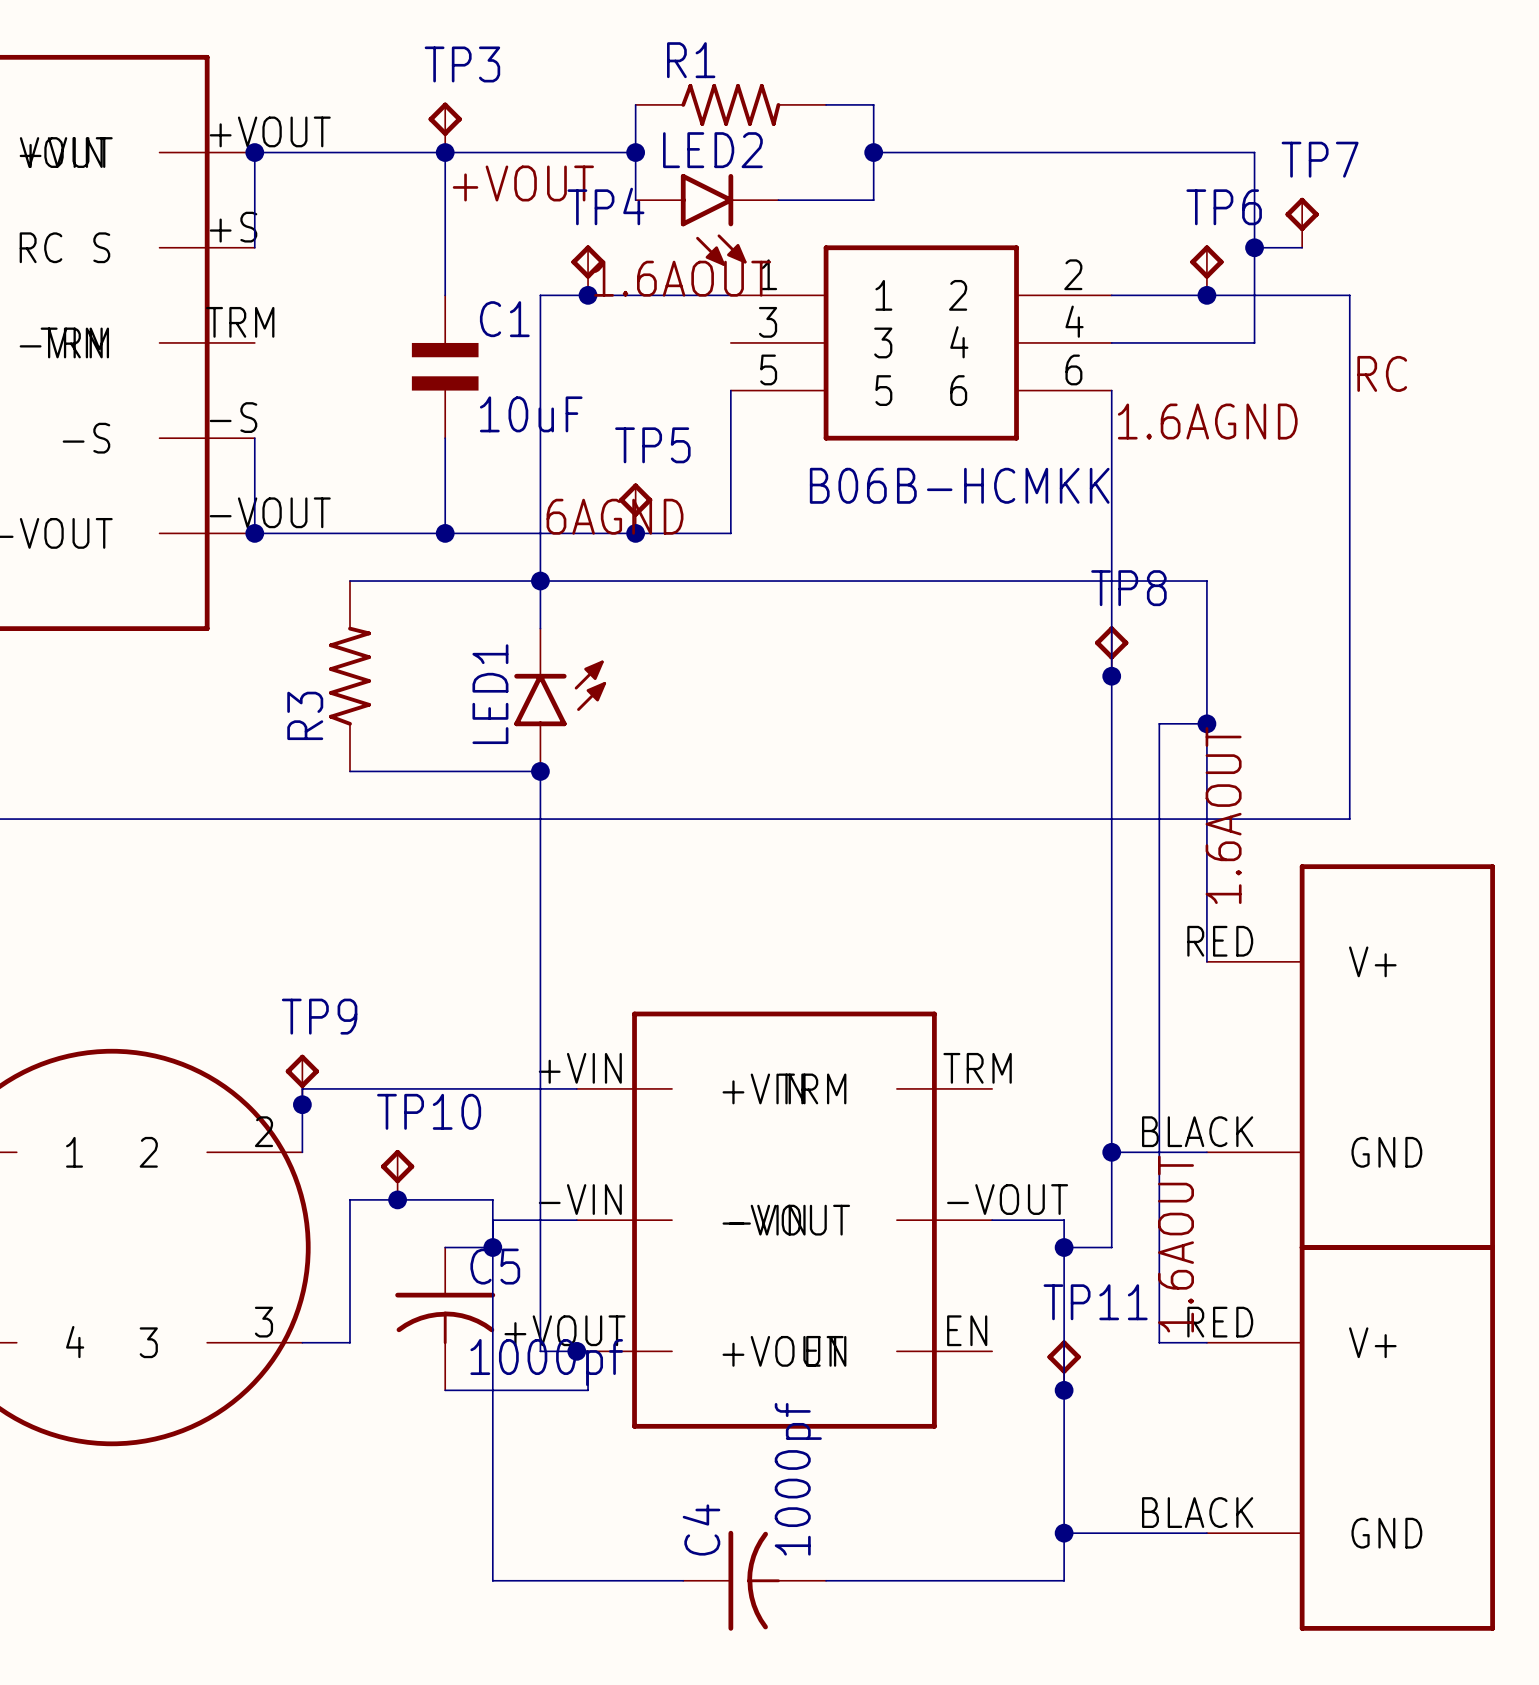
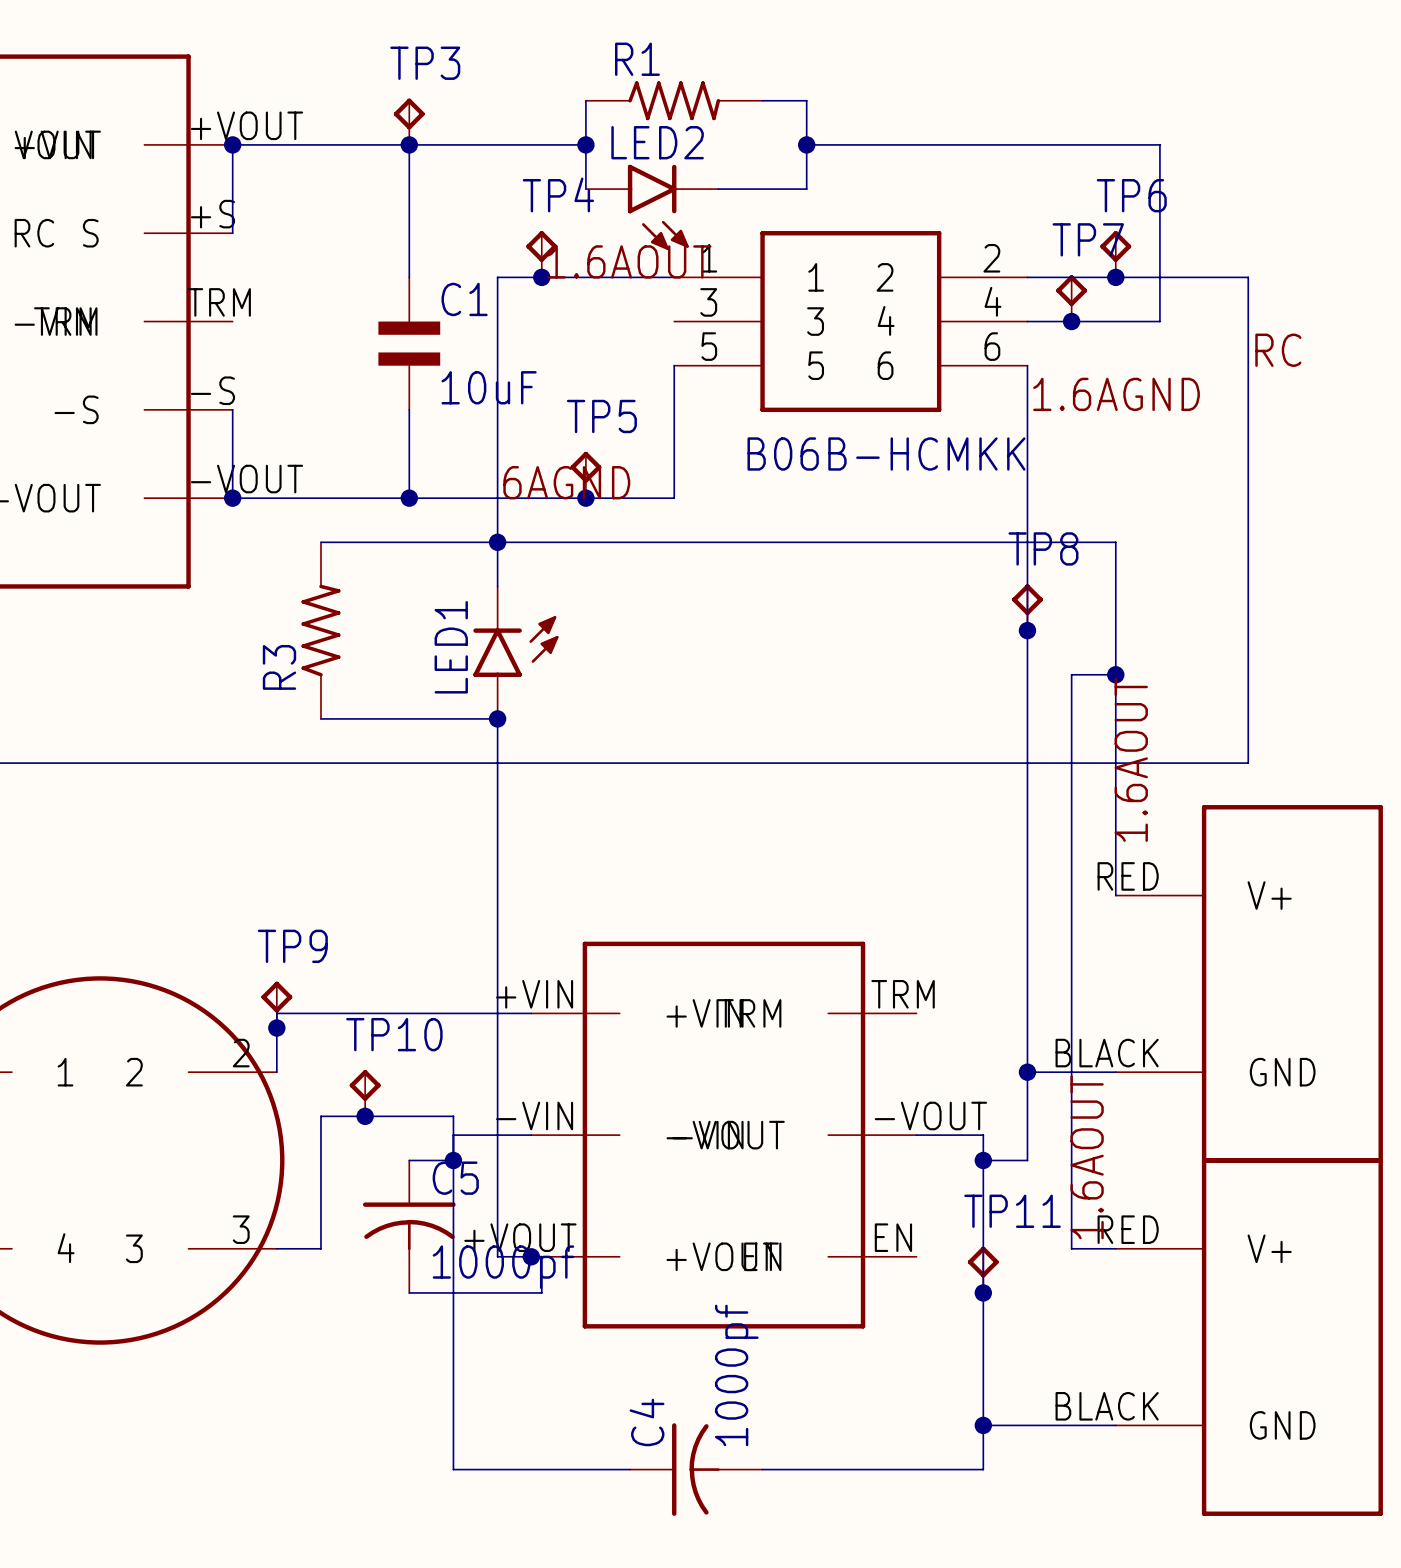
label: +VOUT (523, 183) -> none
TP7 position: (1302, 222) -> (1071, 298)
wire: (1254, 247) (1302, 247) -> none
junction: (1254, 247) -> none
junction: none -> (1071, 321)

